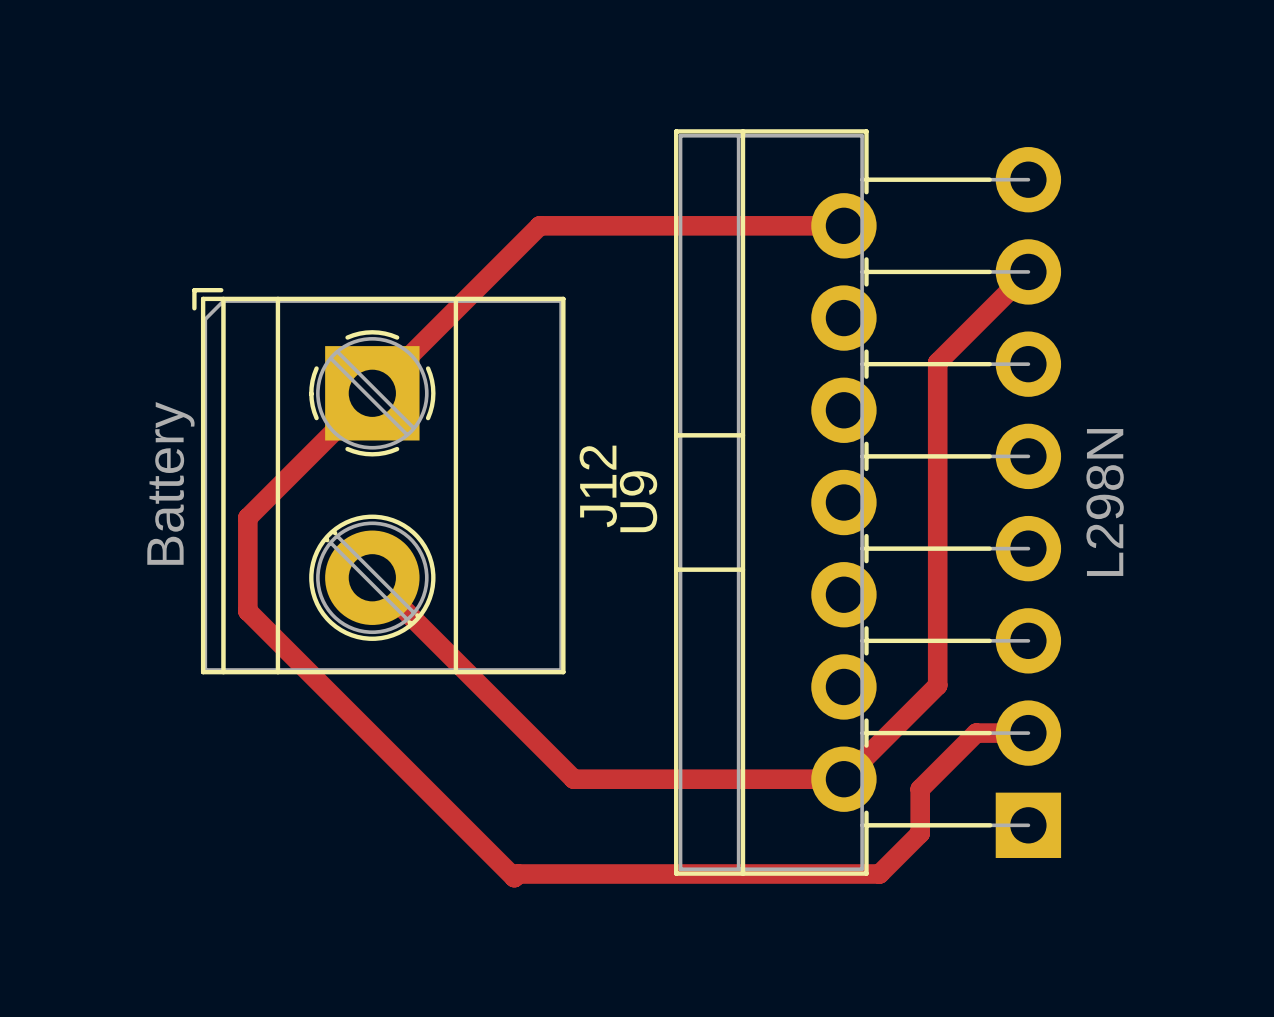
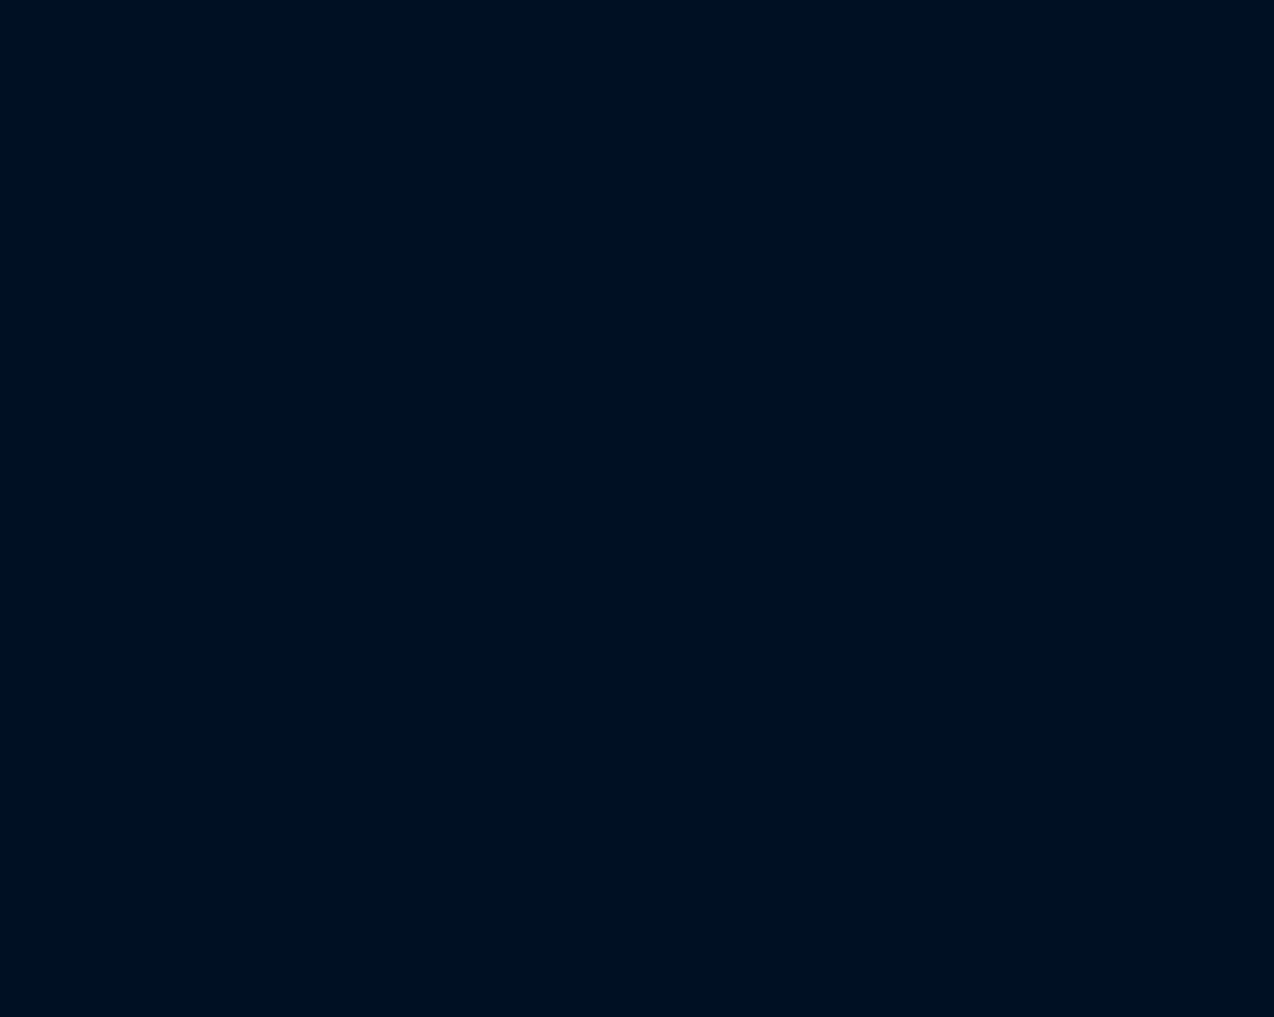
track: (843, 225) (539, 225) (247, 517) (247, 611) (514, 877) (518, 874) (879, 874) (920, 833) (920, 789) (976, 733) (1028, 733) -> none
track: (1028, 271) (937, 362) (937, 685) (843, 779) (573, 779) (372, 577) -> none
J12: Battery (378, 481) -> none
U9: L298N (867, 502) -> none

